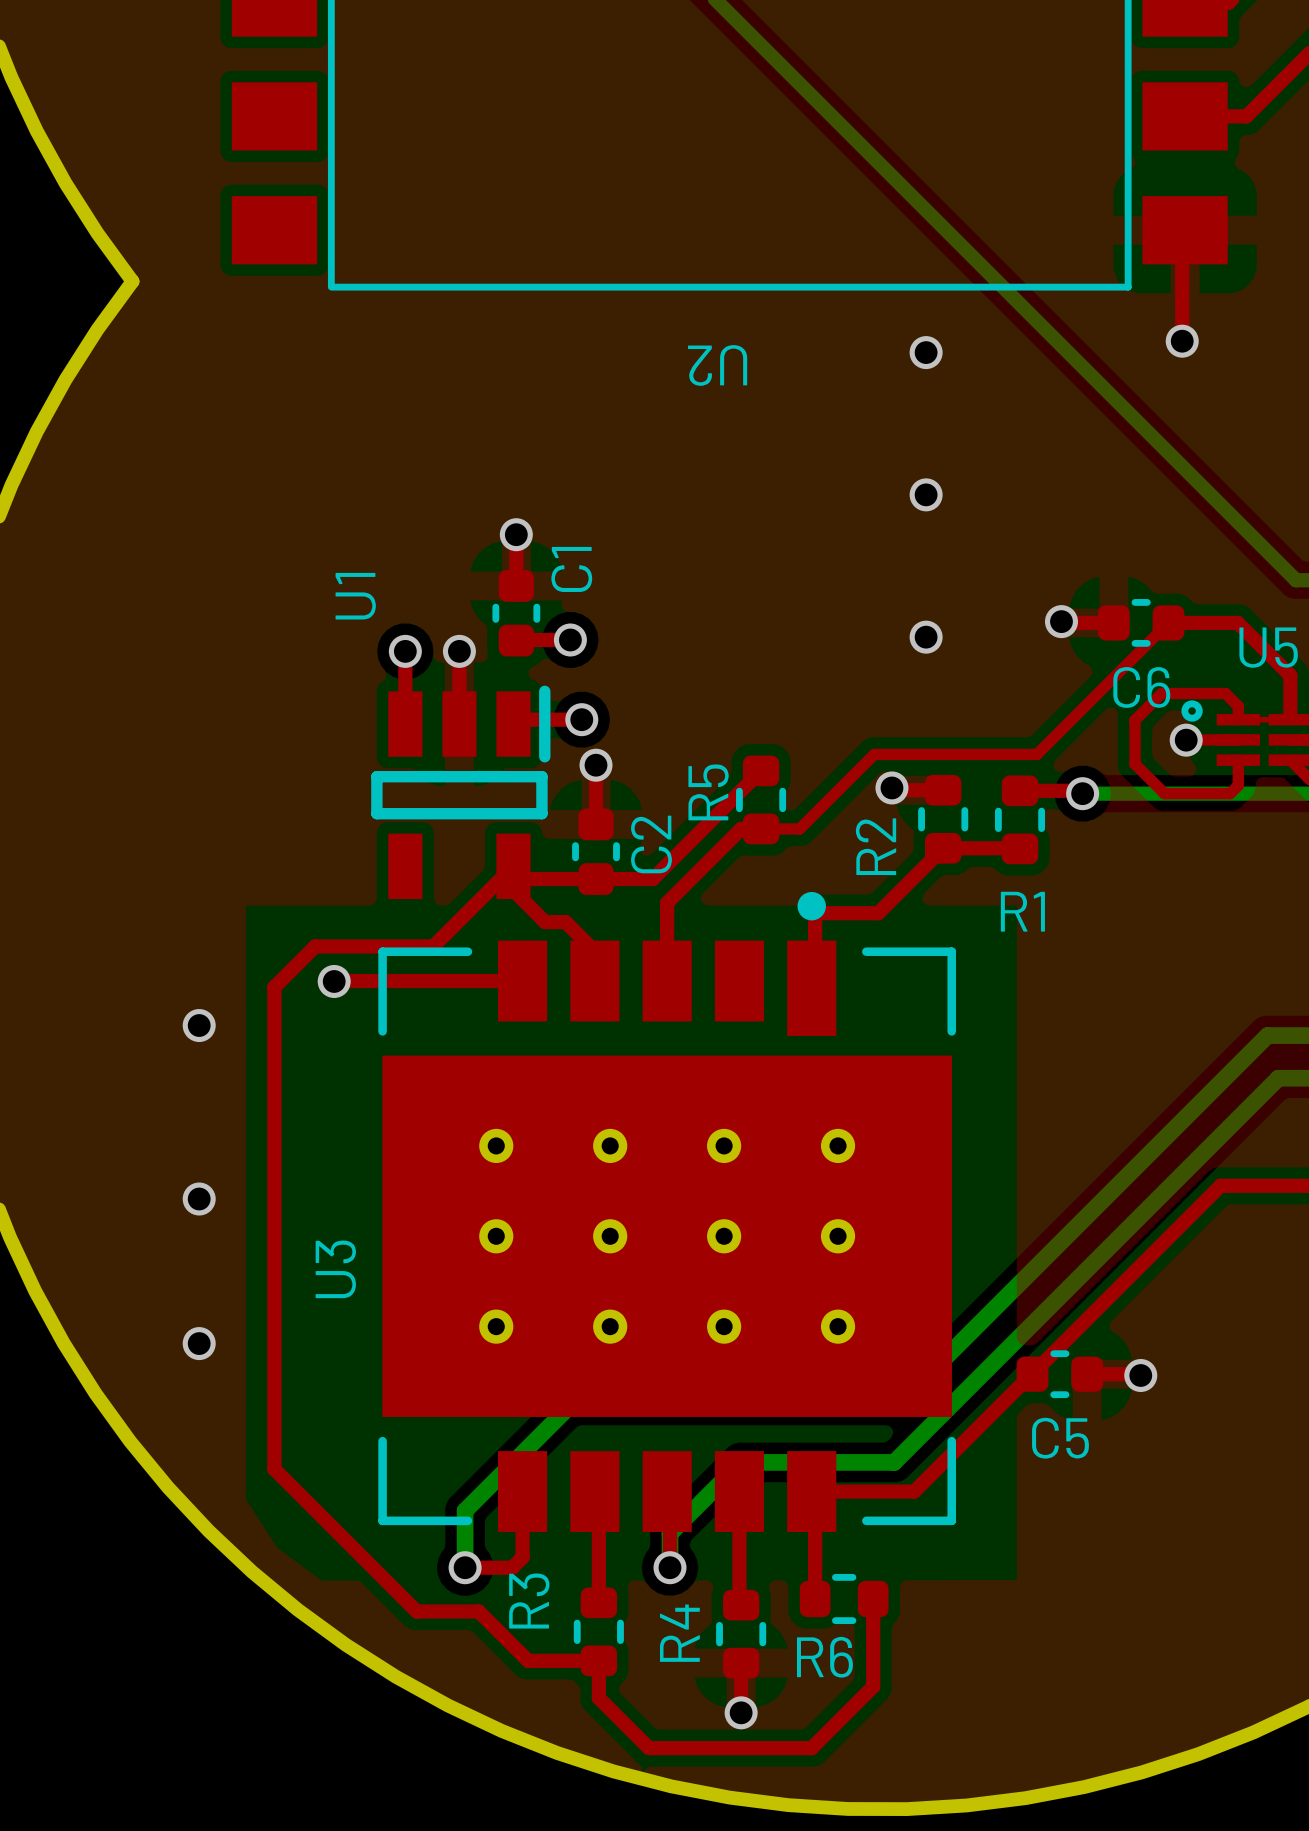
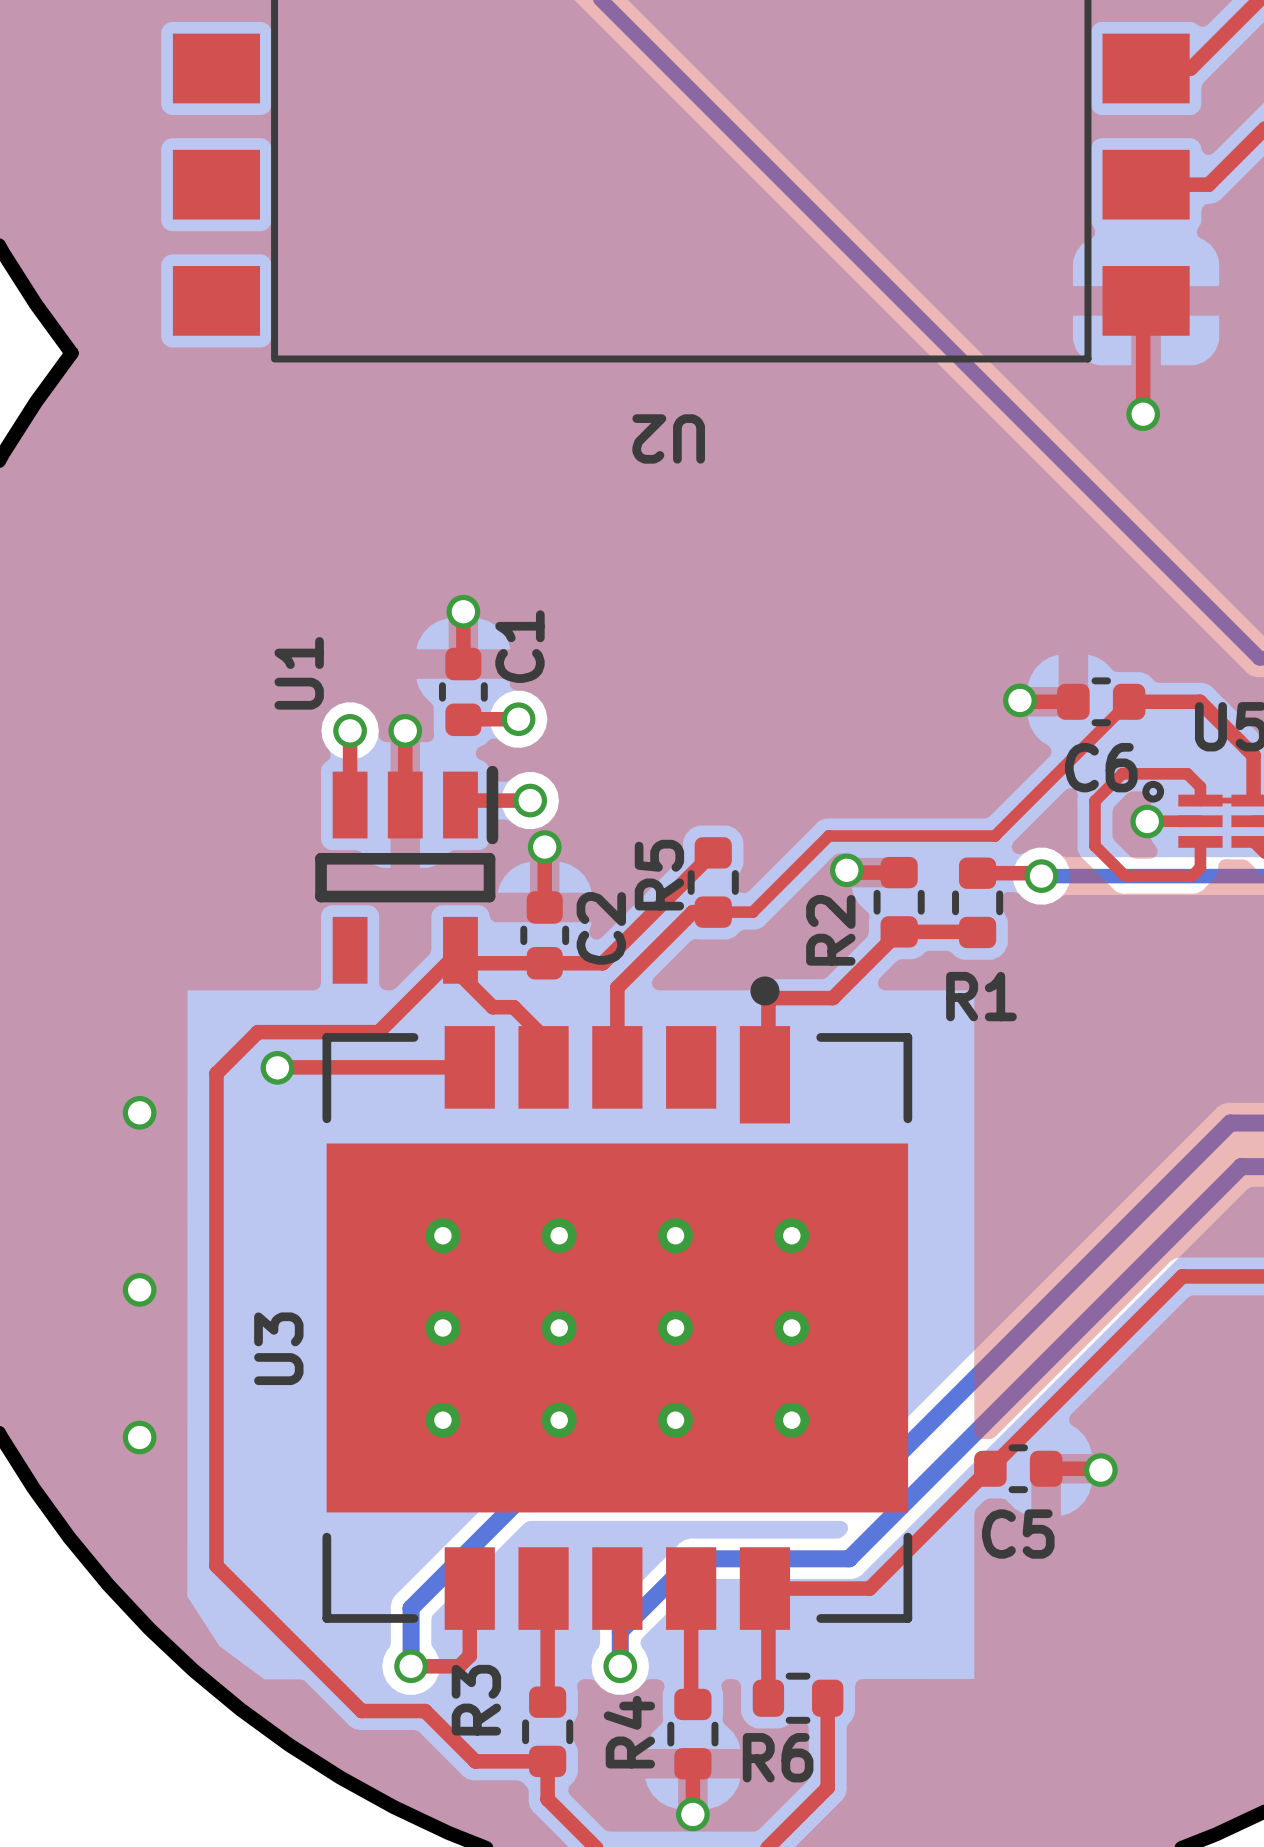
via: (926, 352) -> none
via: (926, 494) -> none
via: (926, 637) -> none

